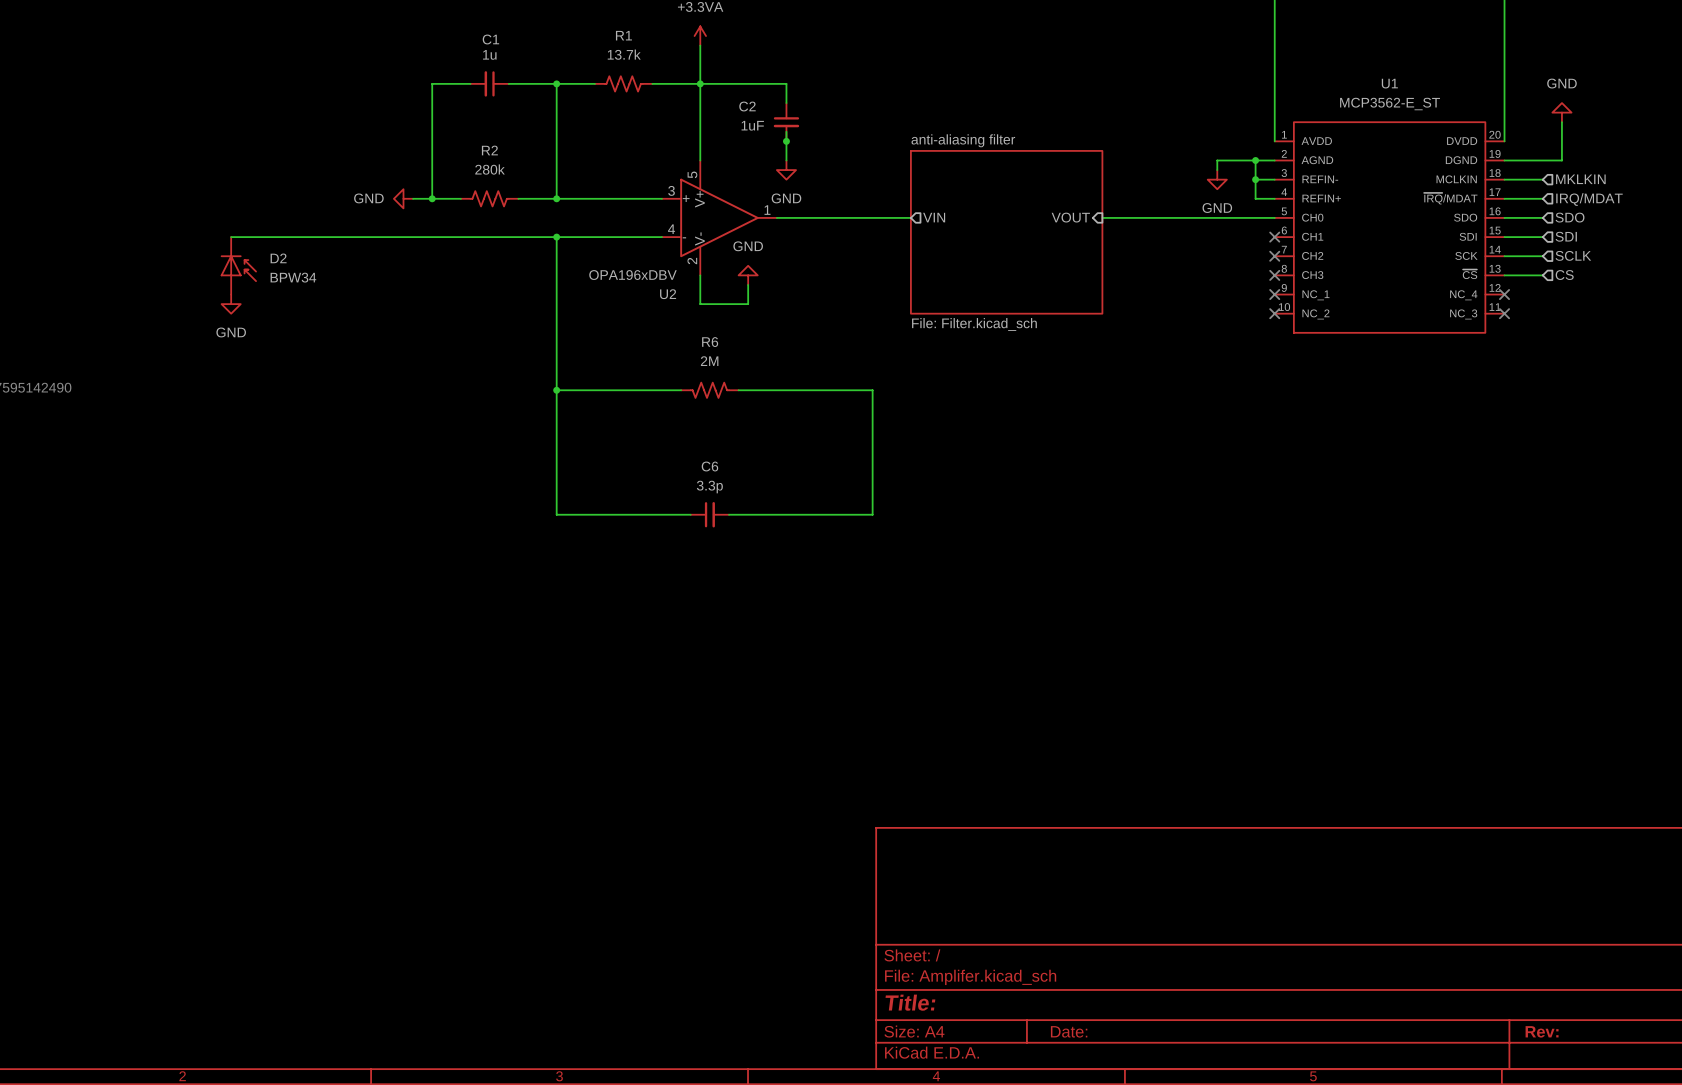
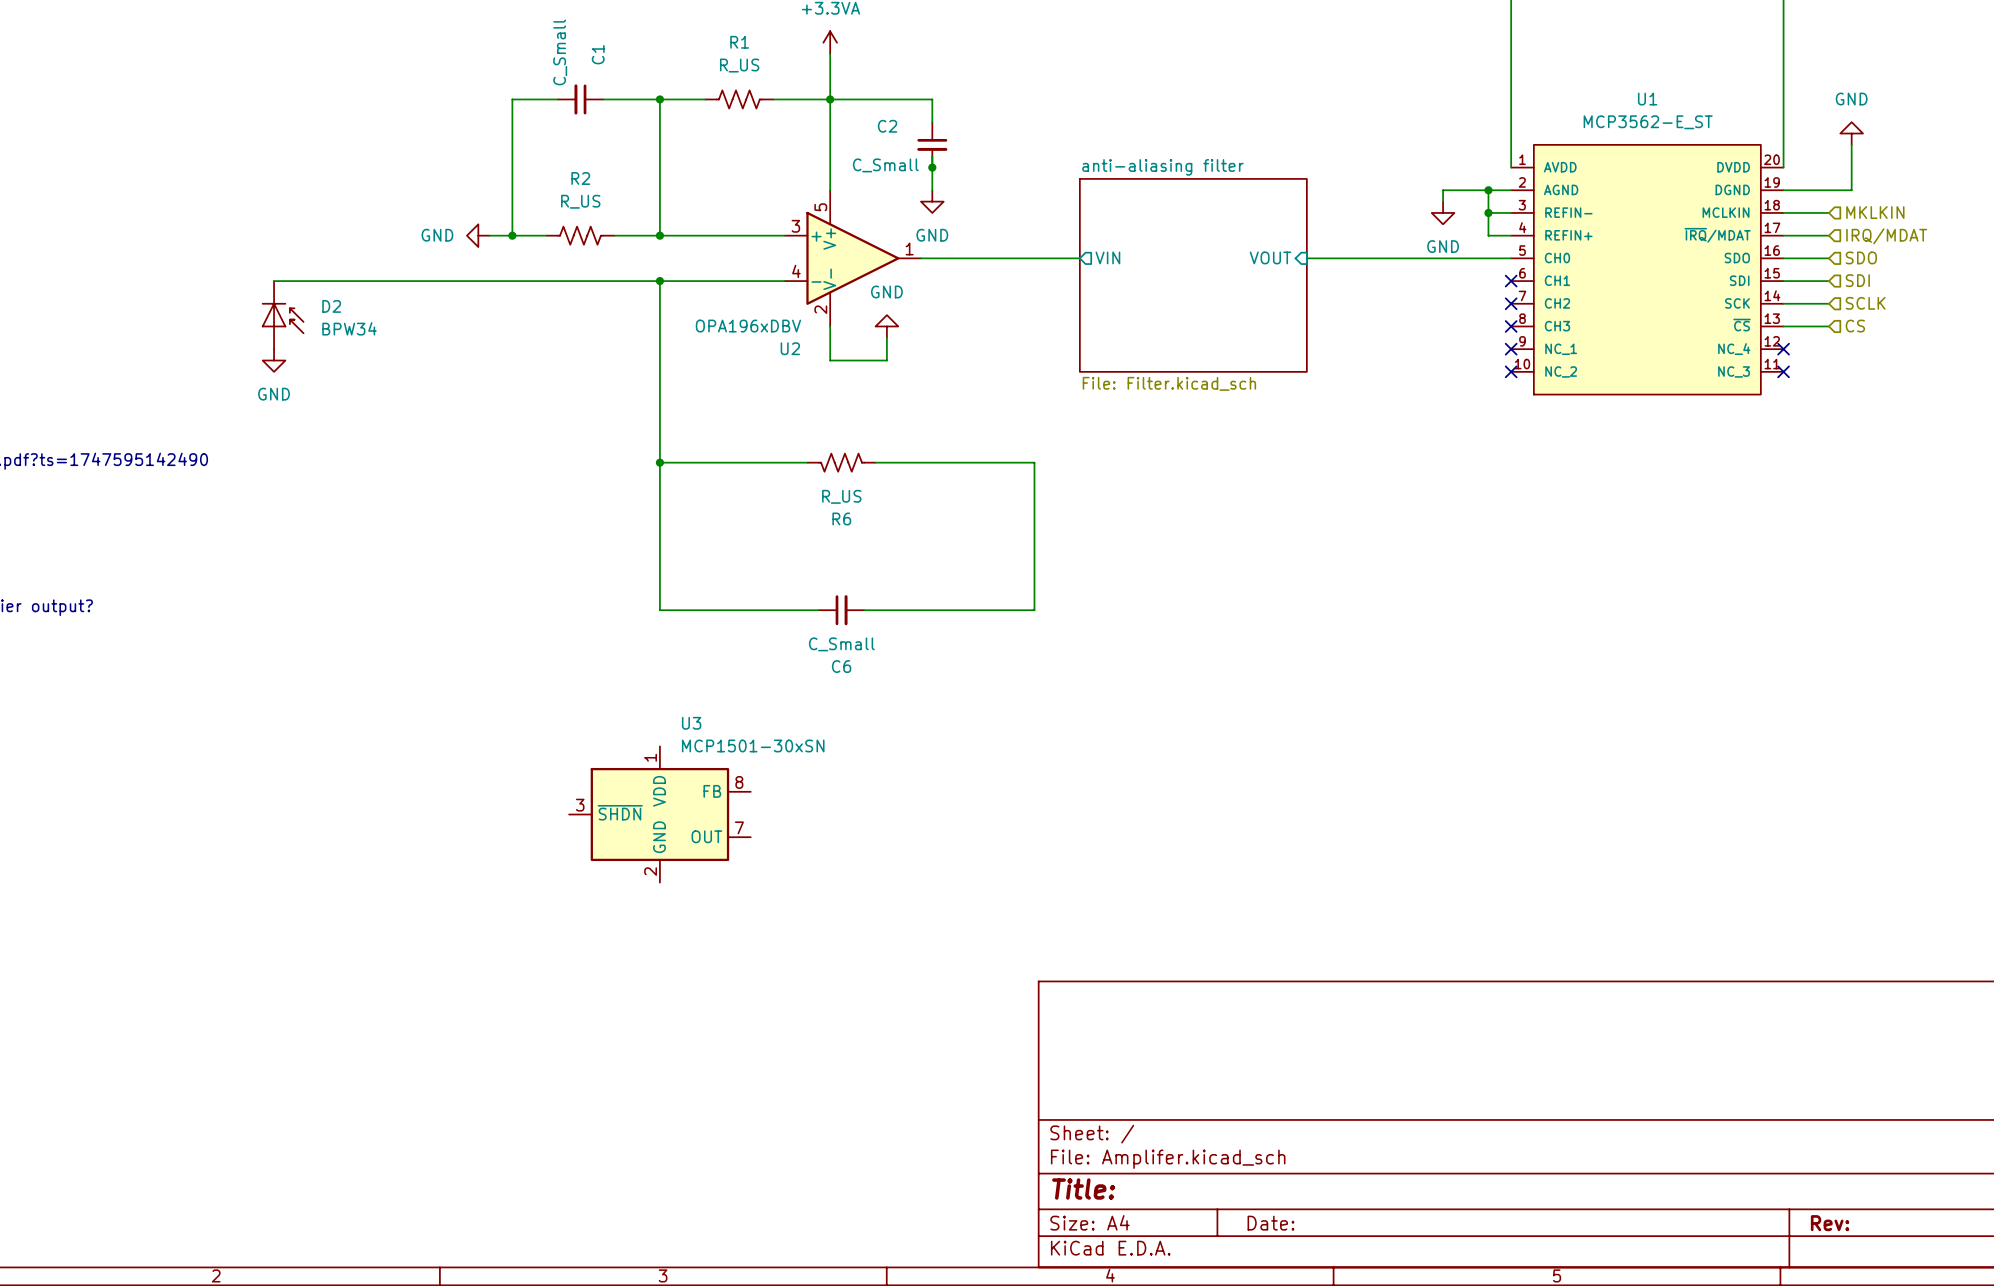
C1 name rotation: 0° (490, 39) -> 90° counterclockwise (598, 54)
C1 value: 1u (489, 54) -> C_Small (560, 52)
R1 value: 13.7k (624, 54) -> R_US (739, 65)
C2 value: 1uF (752, 125) -> C_Small (885, 165)
R2 value: 280k (490, 169) -> R_US (580, 201)
R6 name position: R6 (710, 342) -> R6 (841, 518)
R6 value: 2M (709, 361) -> R_US (841, 496)
C6 name position: C6 (709, 466) -> C6 (841, 666)
C6 value: 3.3p (709, 487) -> C_Small (841, 644)
U3: none -> MCP1501-30xSN (659, 814)

